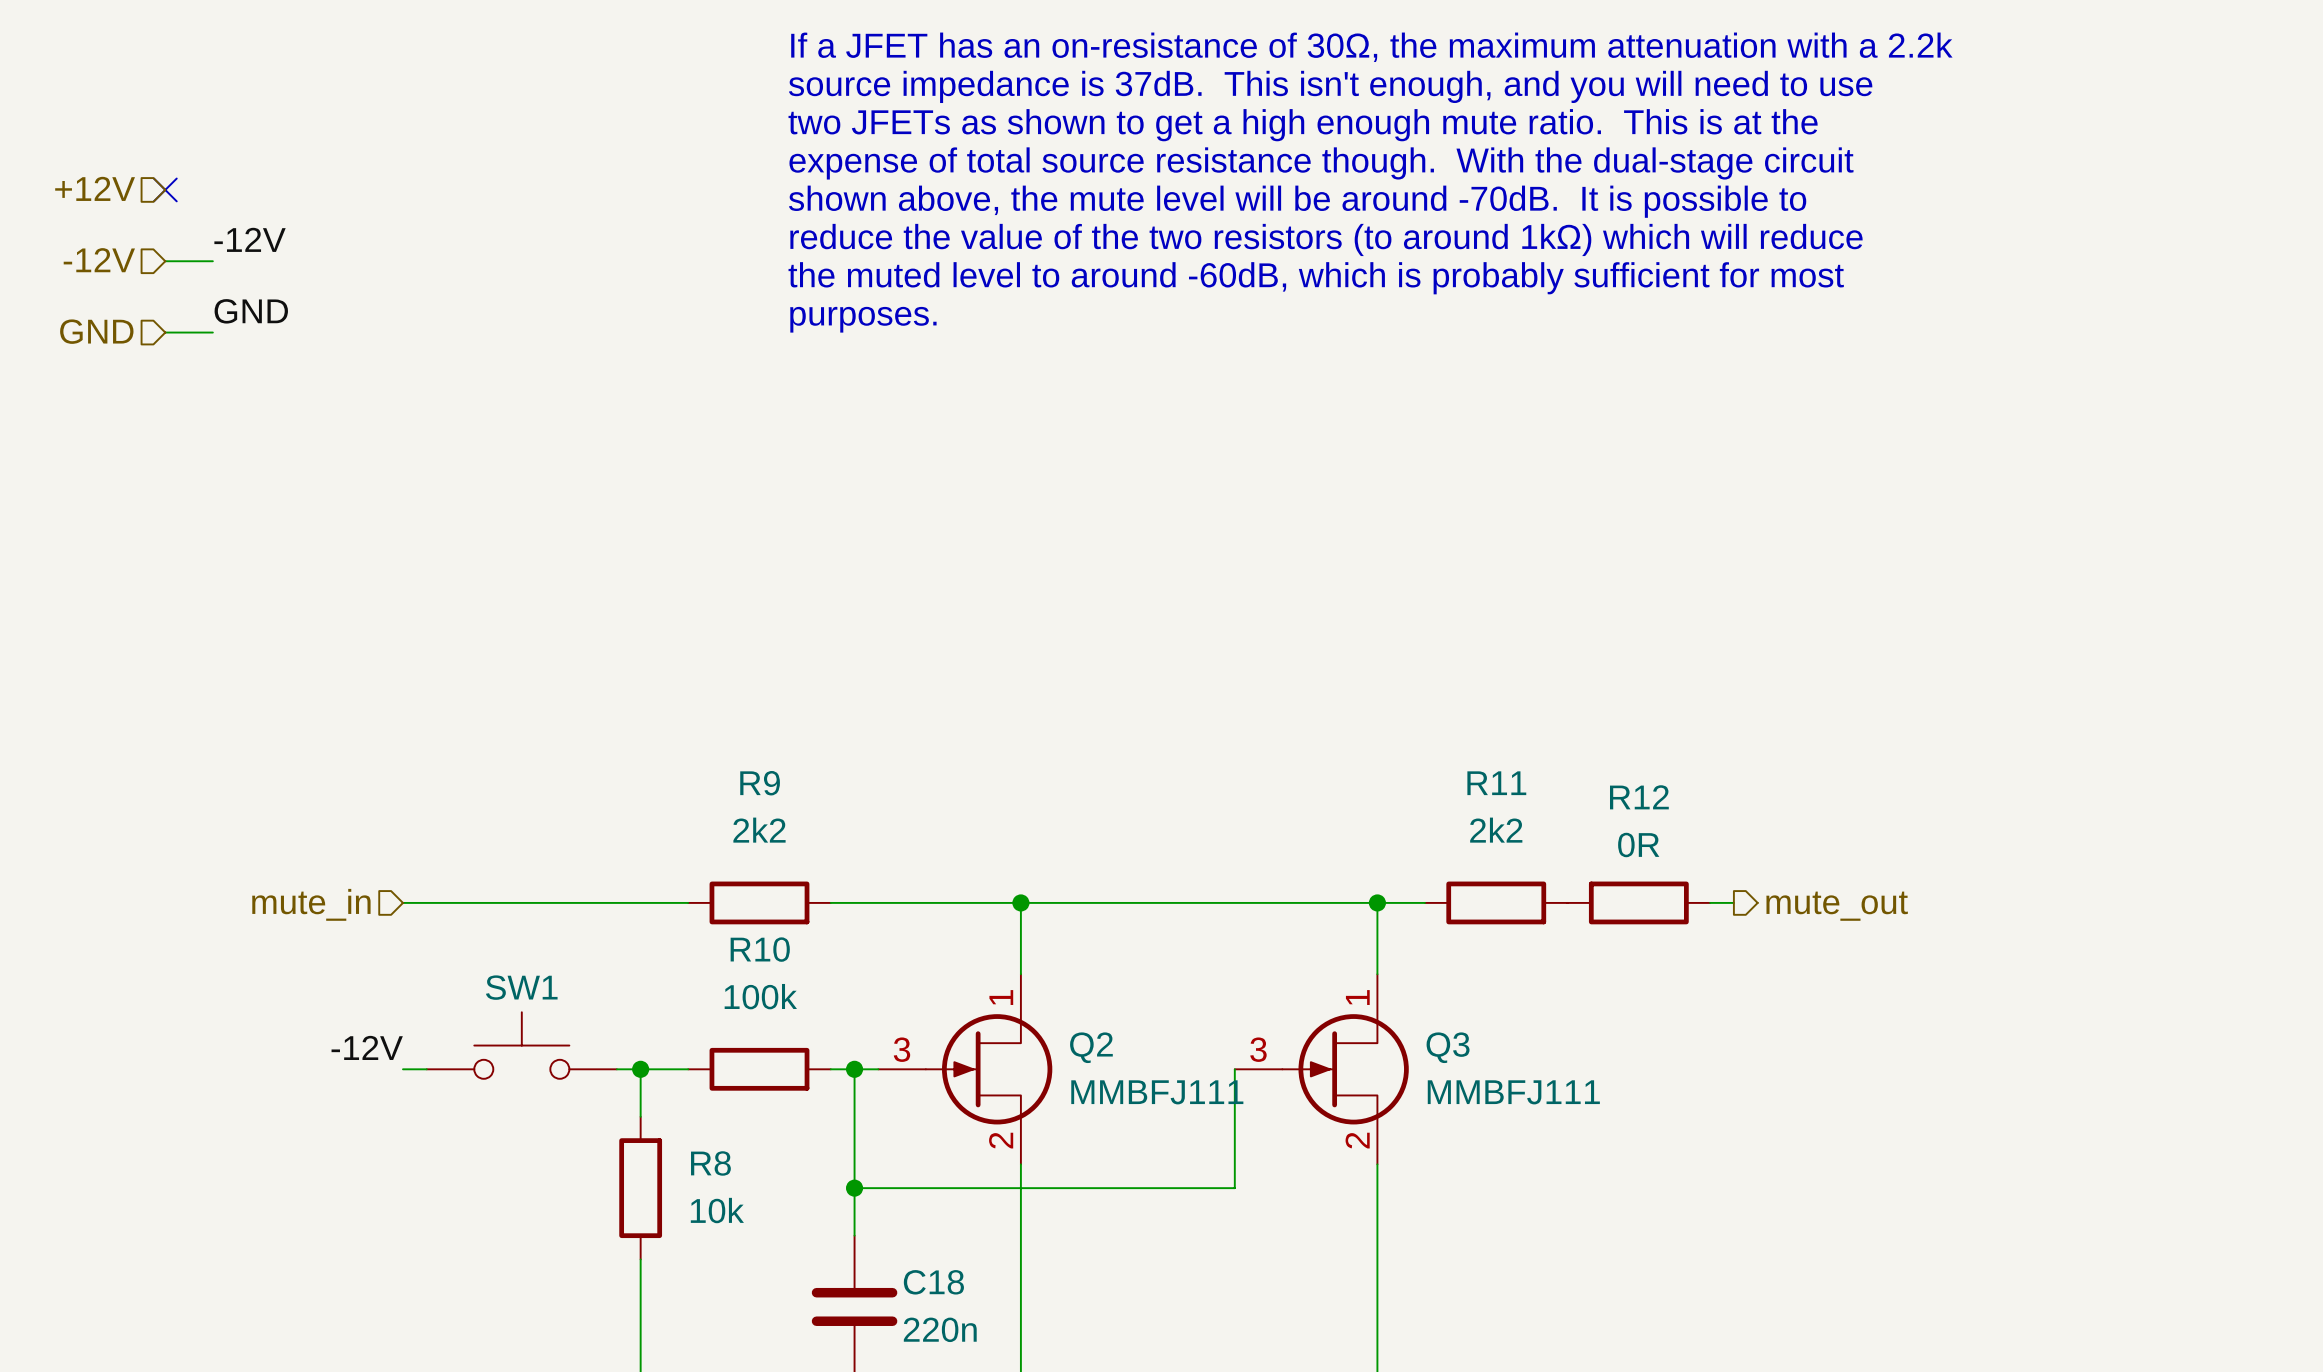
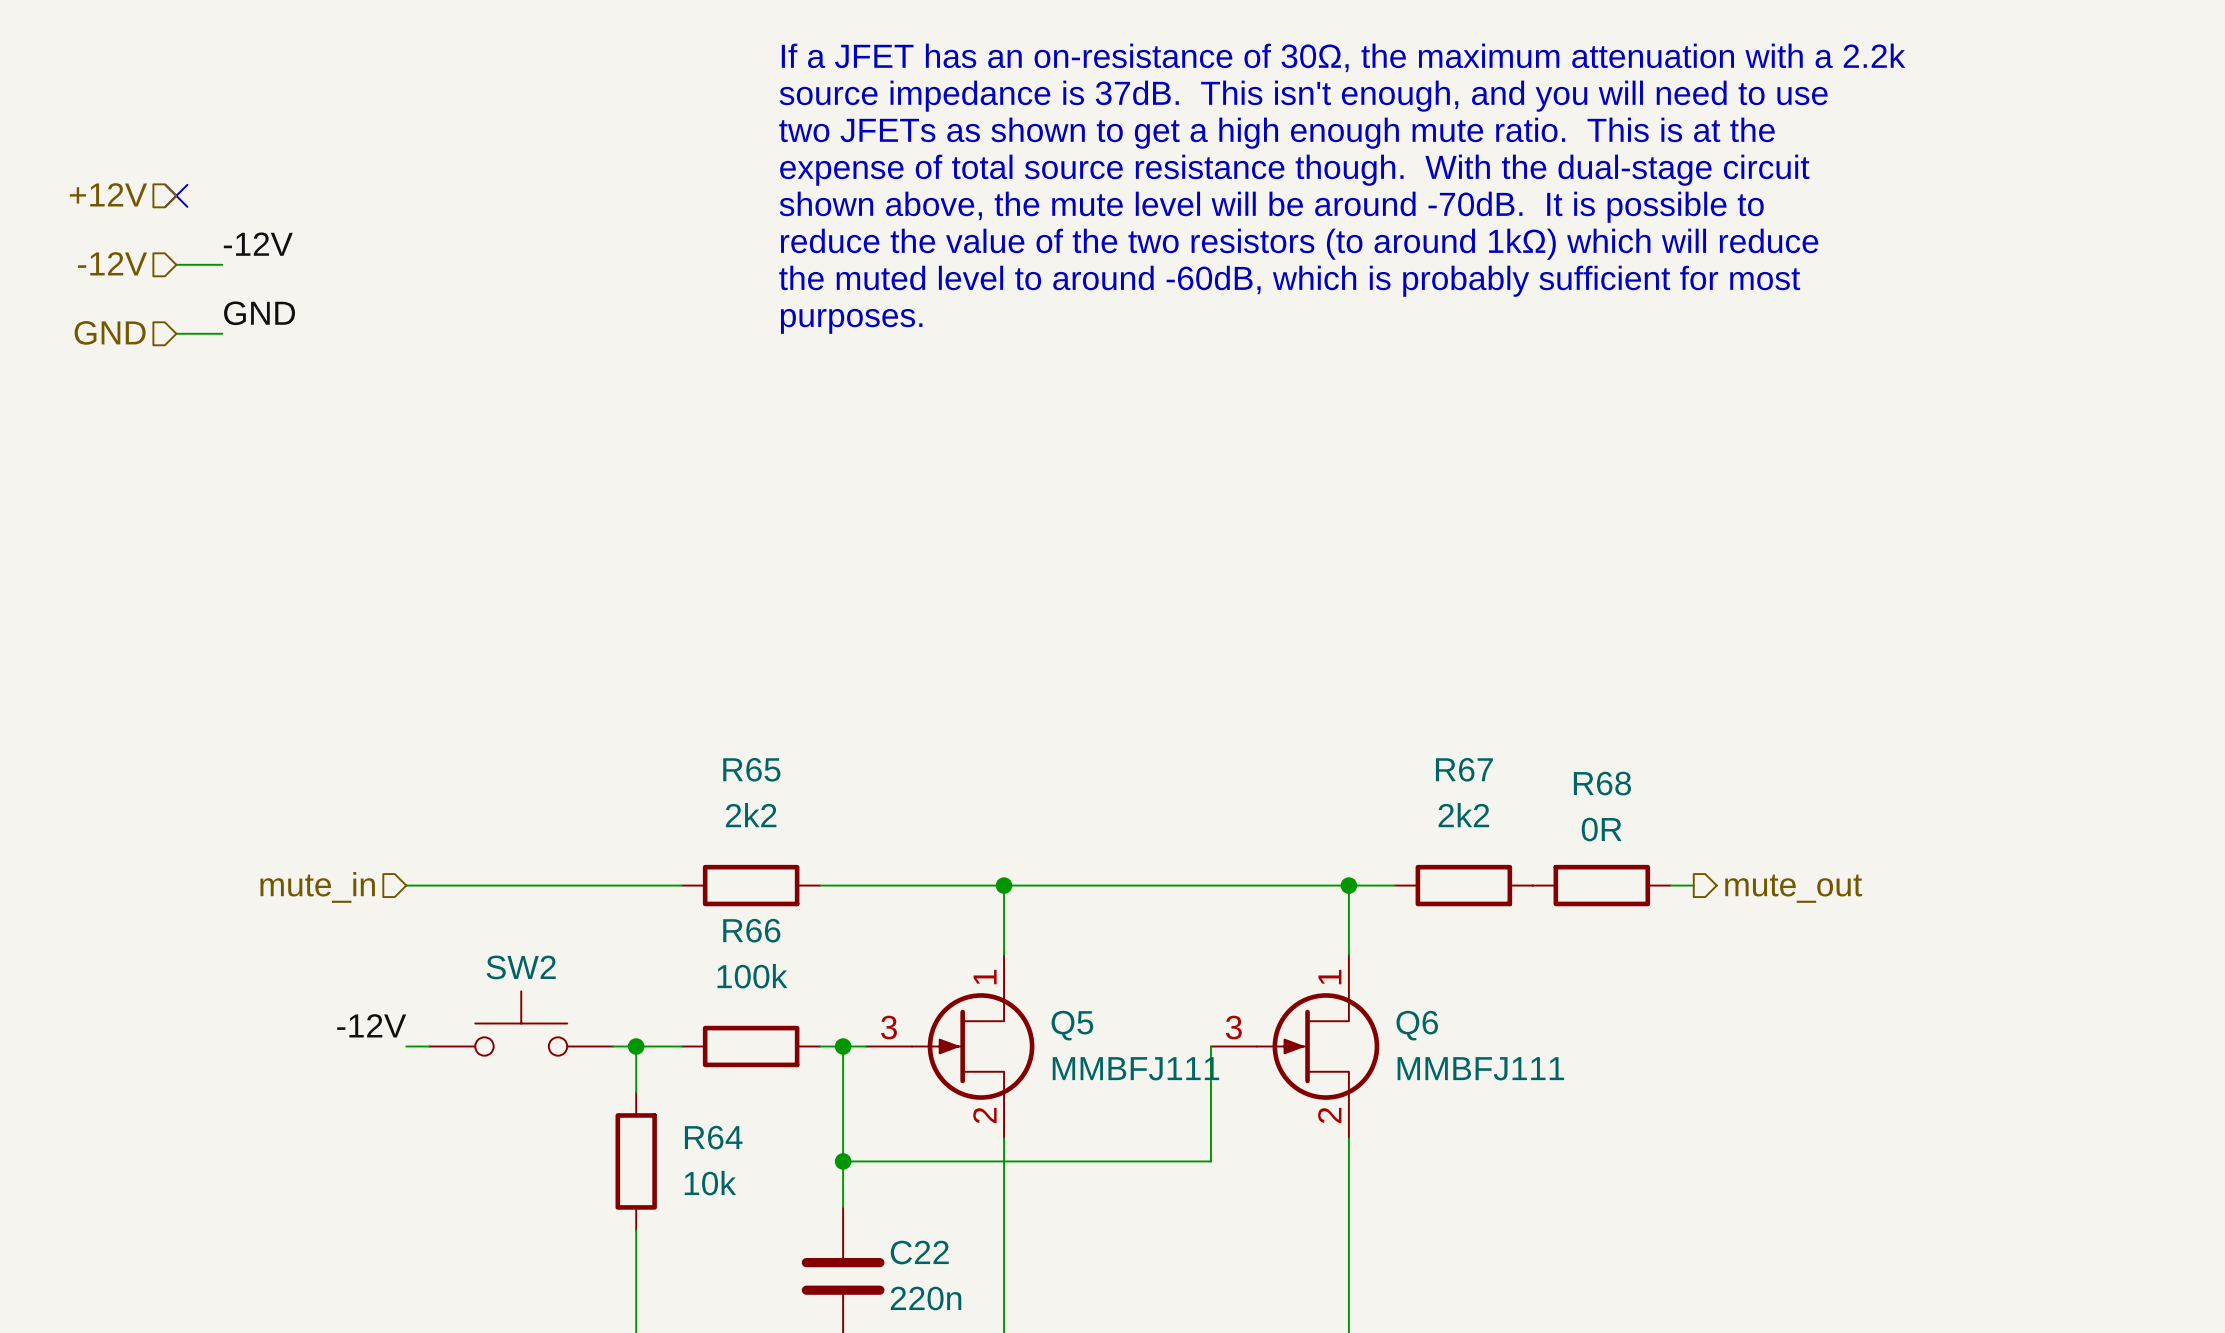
R9 name: R9 (760, 783) -> R65 (751, 769)
R11 name: R11 (1496, 783) -> R67 (1464, 769)
R12 name: R12 (1639, 797) -> R68 (1602, 783)
R10 name: R10 (760, 949) -> R66 (751, 930)
SW1 name: SW1 (521, 987) -> SW2 (521, 967)
Q2 name: Q2 (1091, 1047) -> Q5 (1072, 1025)
Q3 name: Q3 (1448, 1047) -> Q6 (1417, 1025)
R8 name: R8 (710, 1163) -> R64 (713, 1137)
C18 name: C18 (933, 1282) -> C22 (919, 1252)

